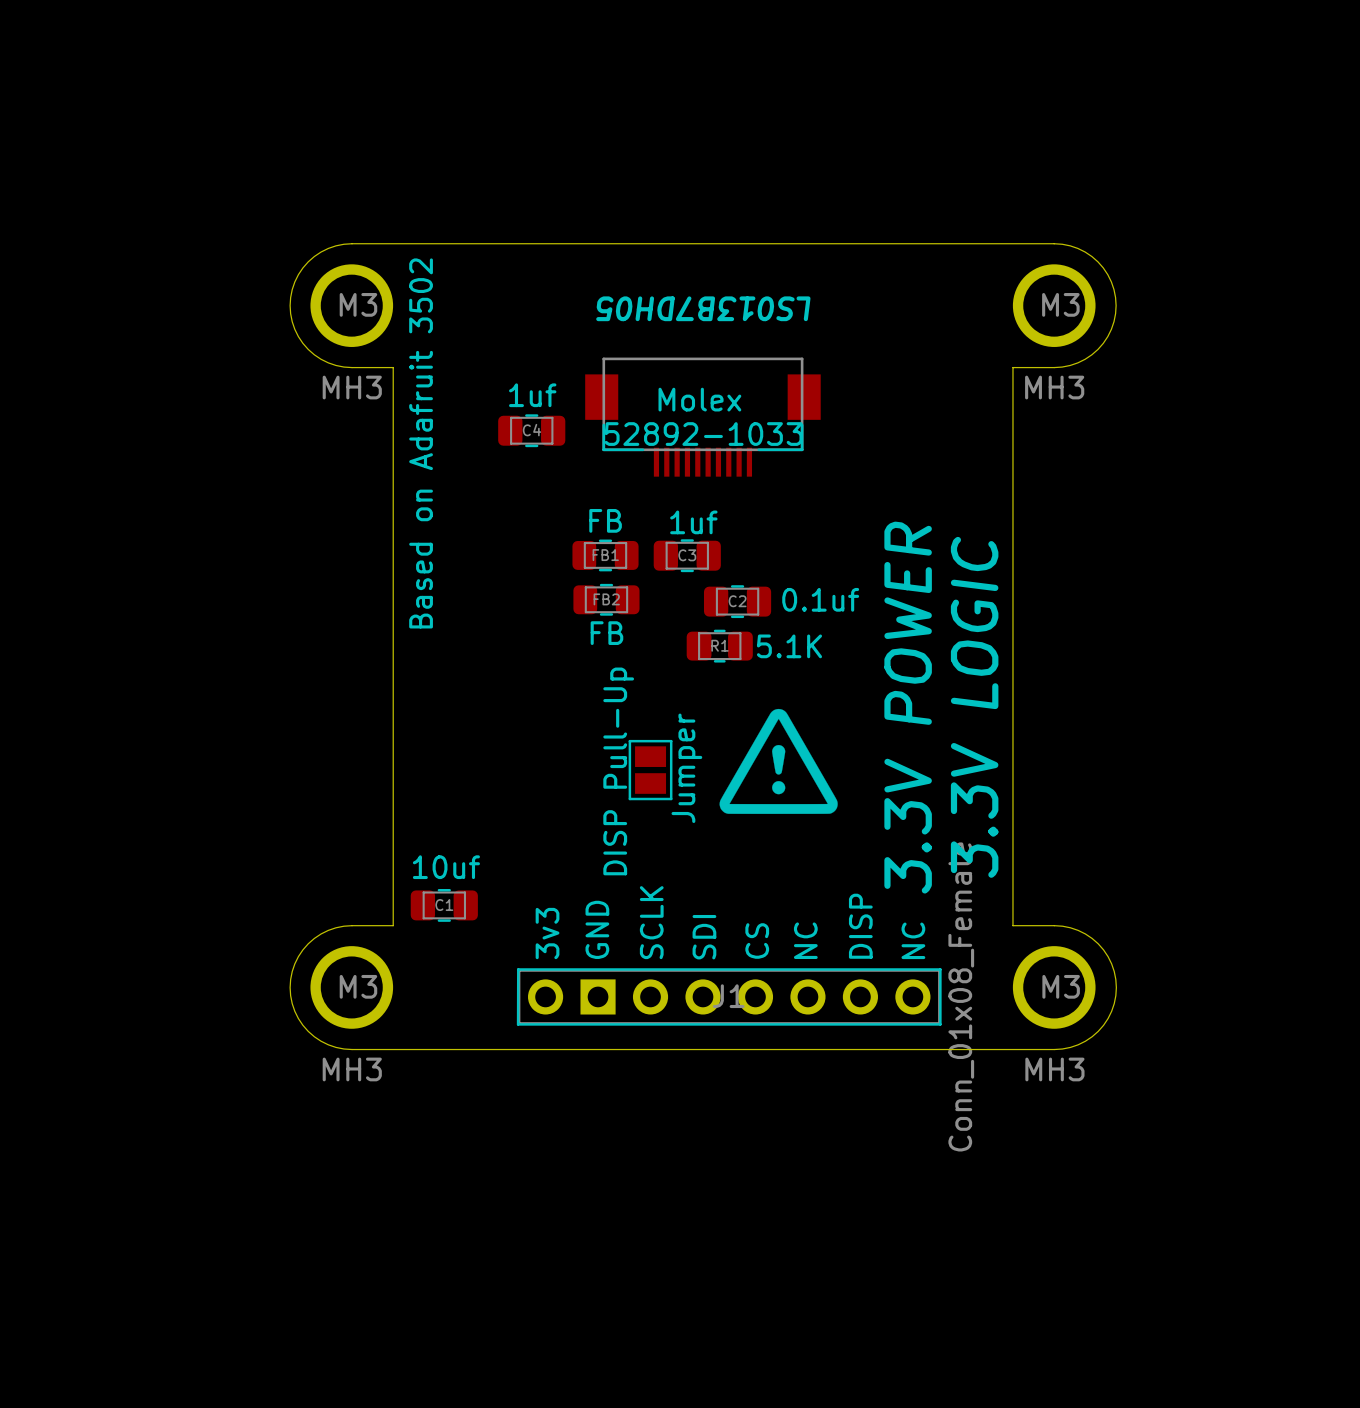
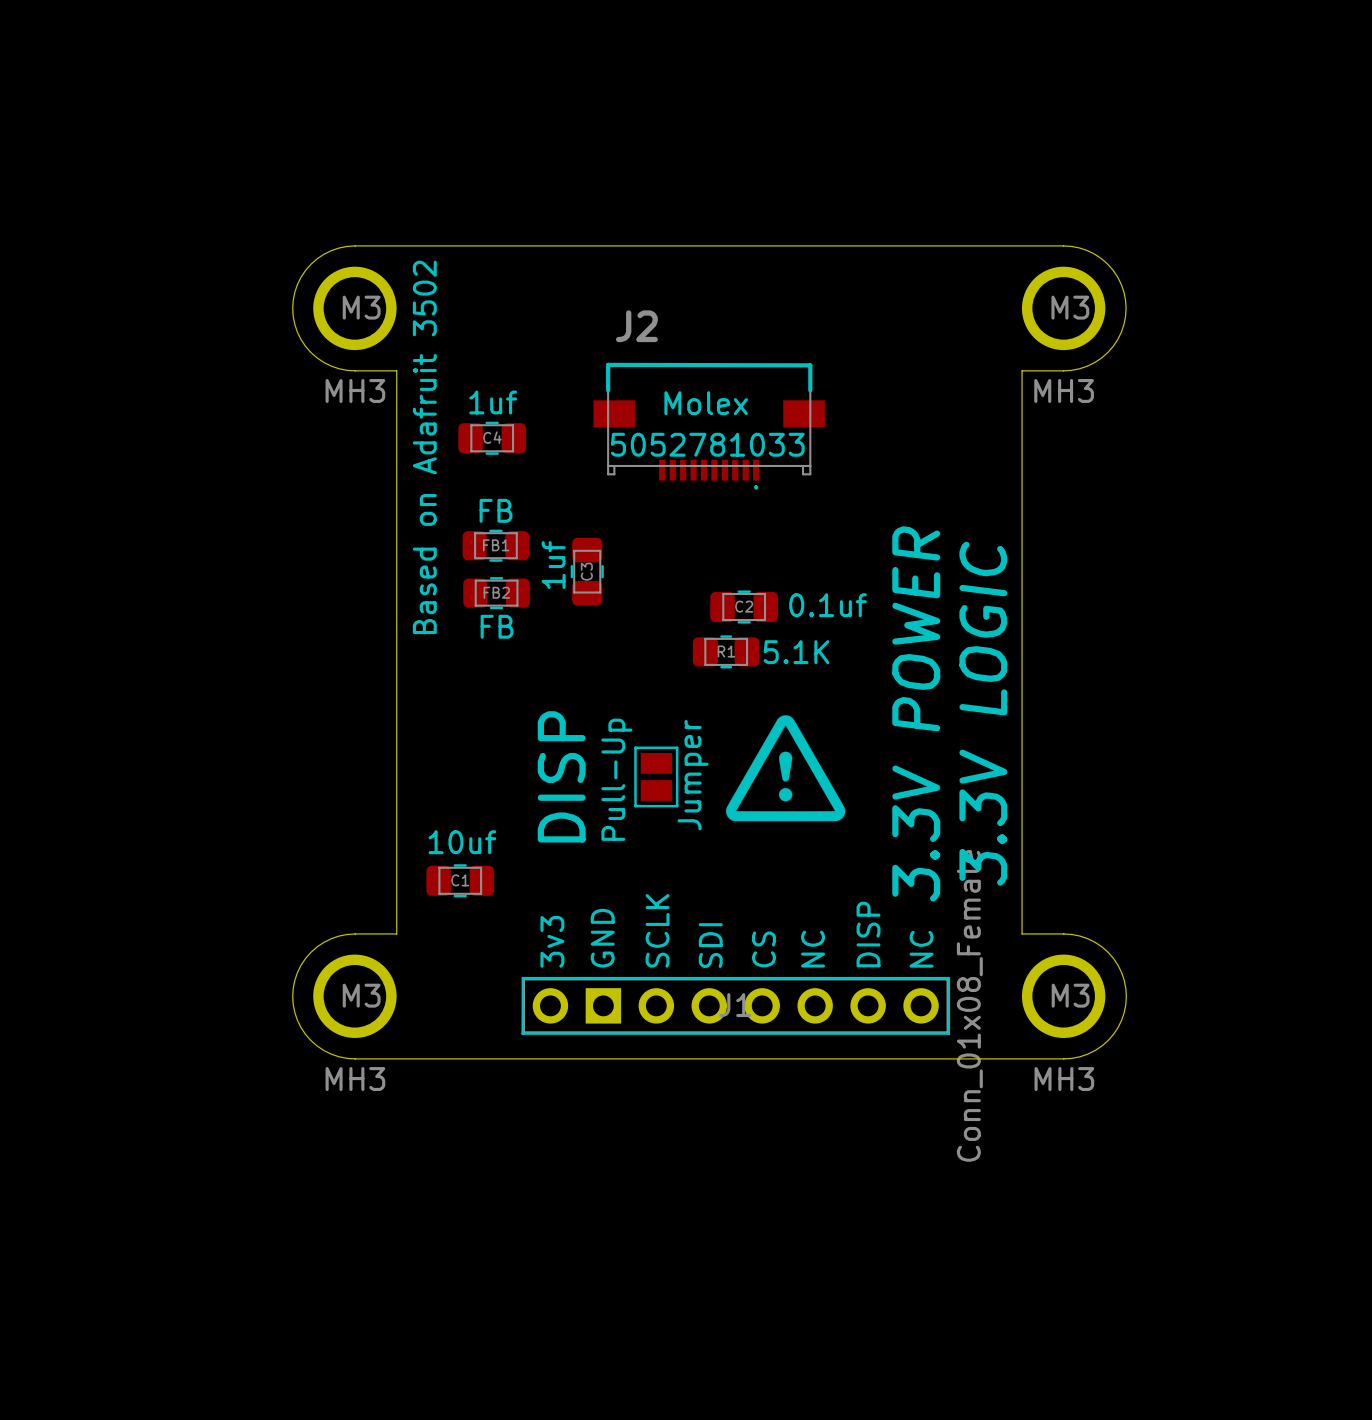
part: LS013B7DH05 (702, 417) -> none
J2: none -> 5052781033 (709, 426)
C4 position: (531, 430) -> (492, 438)
C3 value position: 1uf (693, 522) -> 1uf (553, 565)
FB1 position: (605, 555) -> (495, 545)
C3 rotation: 0° (687, 555) -> 90° clockwise (587, 571)
C3 position: (687, 555) -> (587, 571)
FB2 position: (606, 599) -> (496, 593)
text: none -> DISP (561, 776)
text: DISP Pull-Up (618, 771) -> Pull-Up (616, 779)
C1 position: (444, 905) -> (460, 880)

